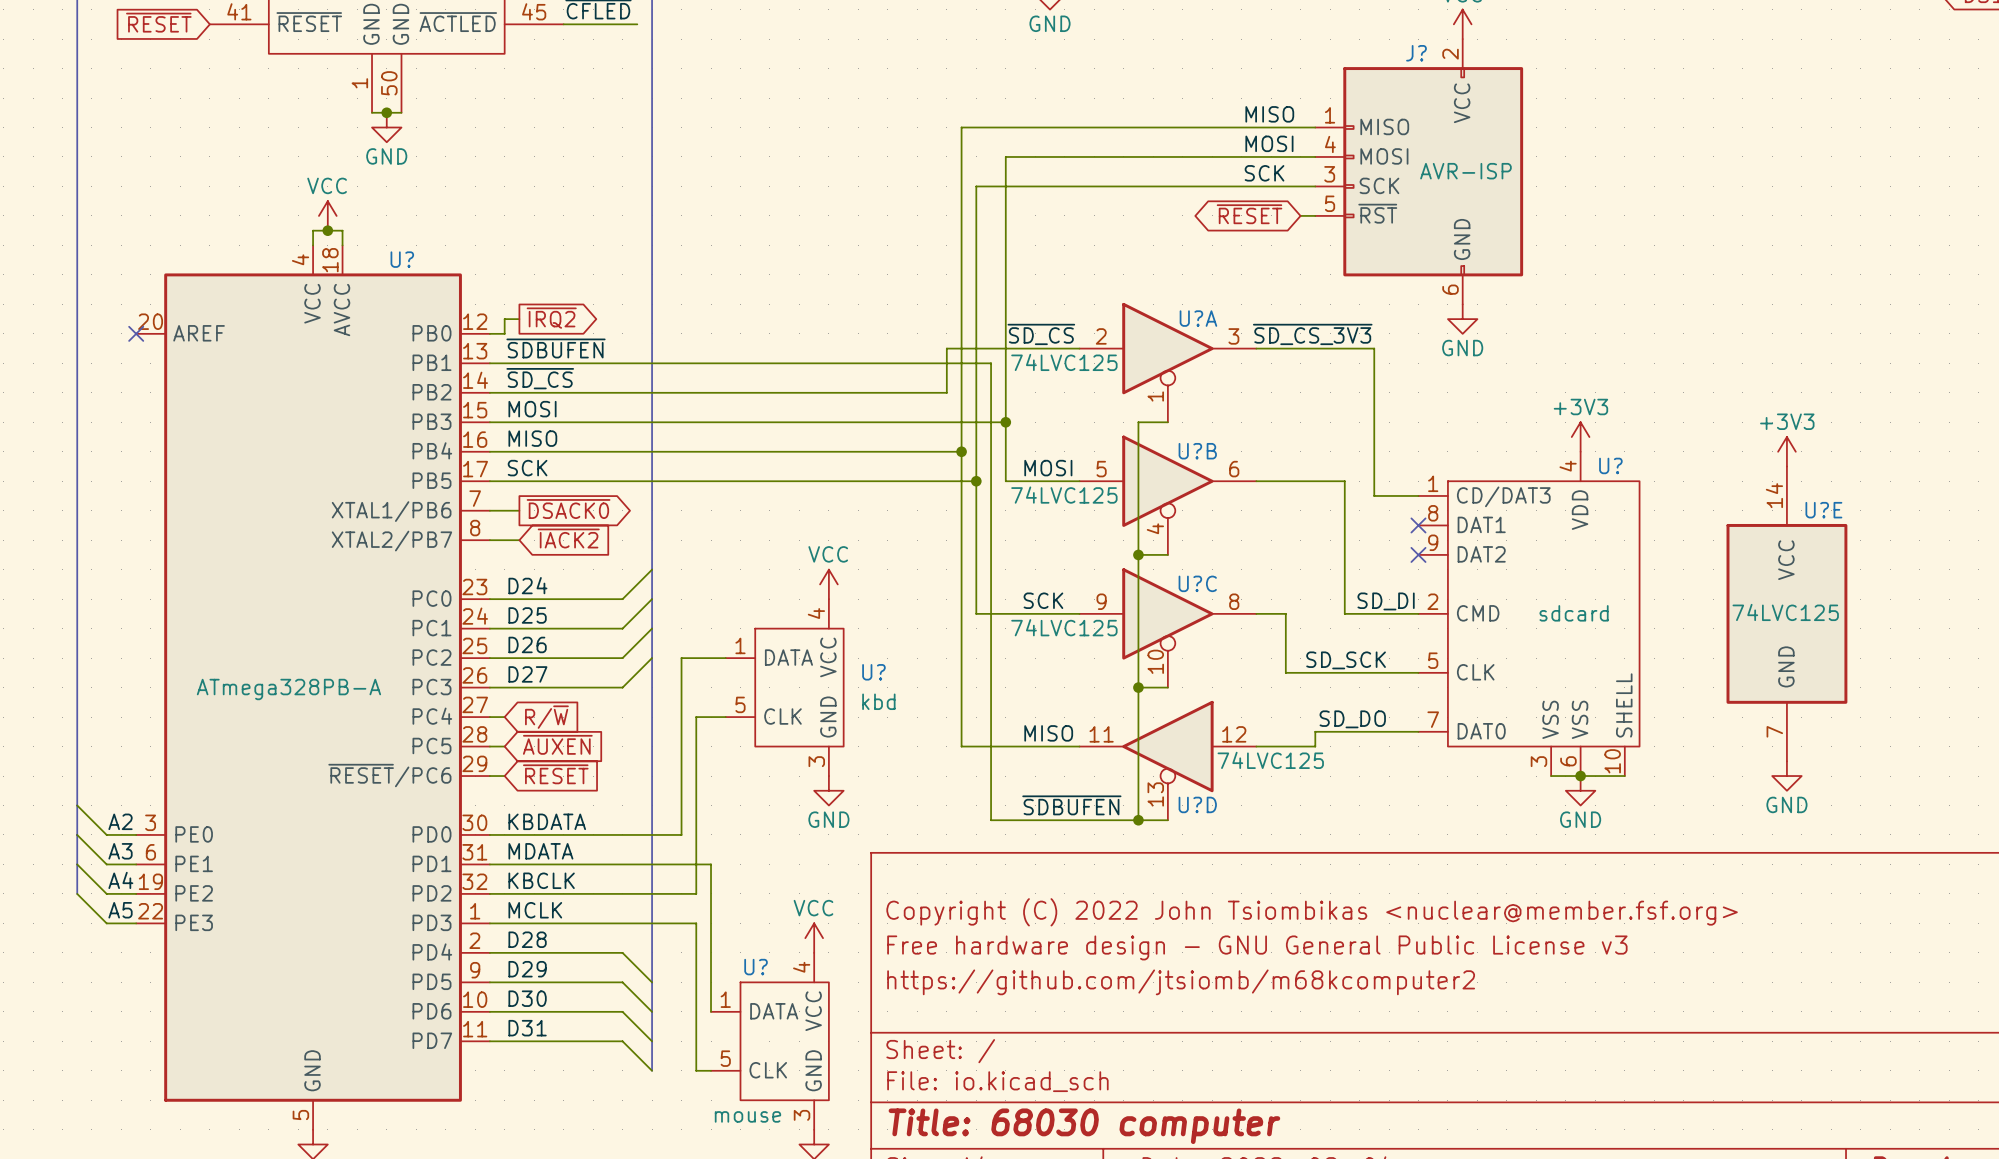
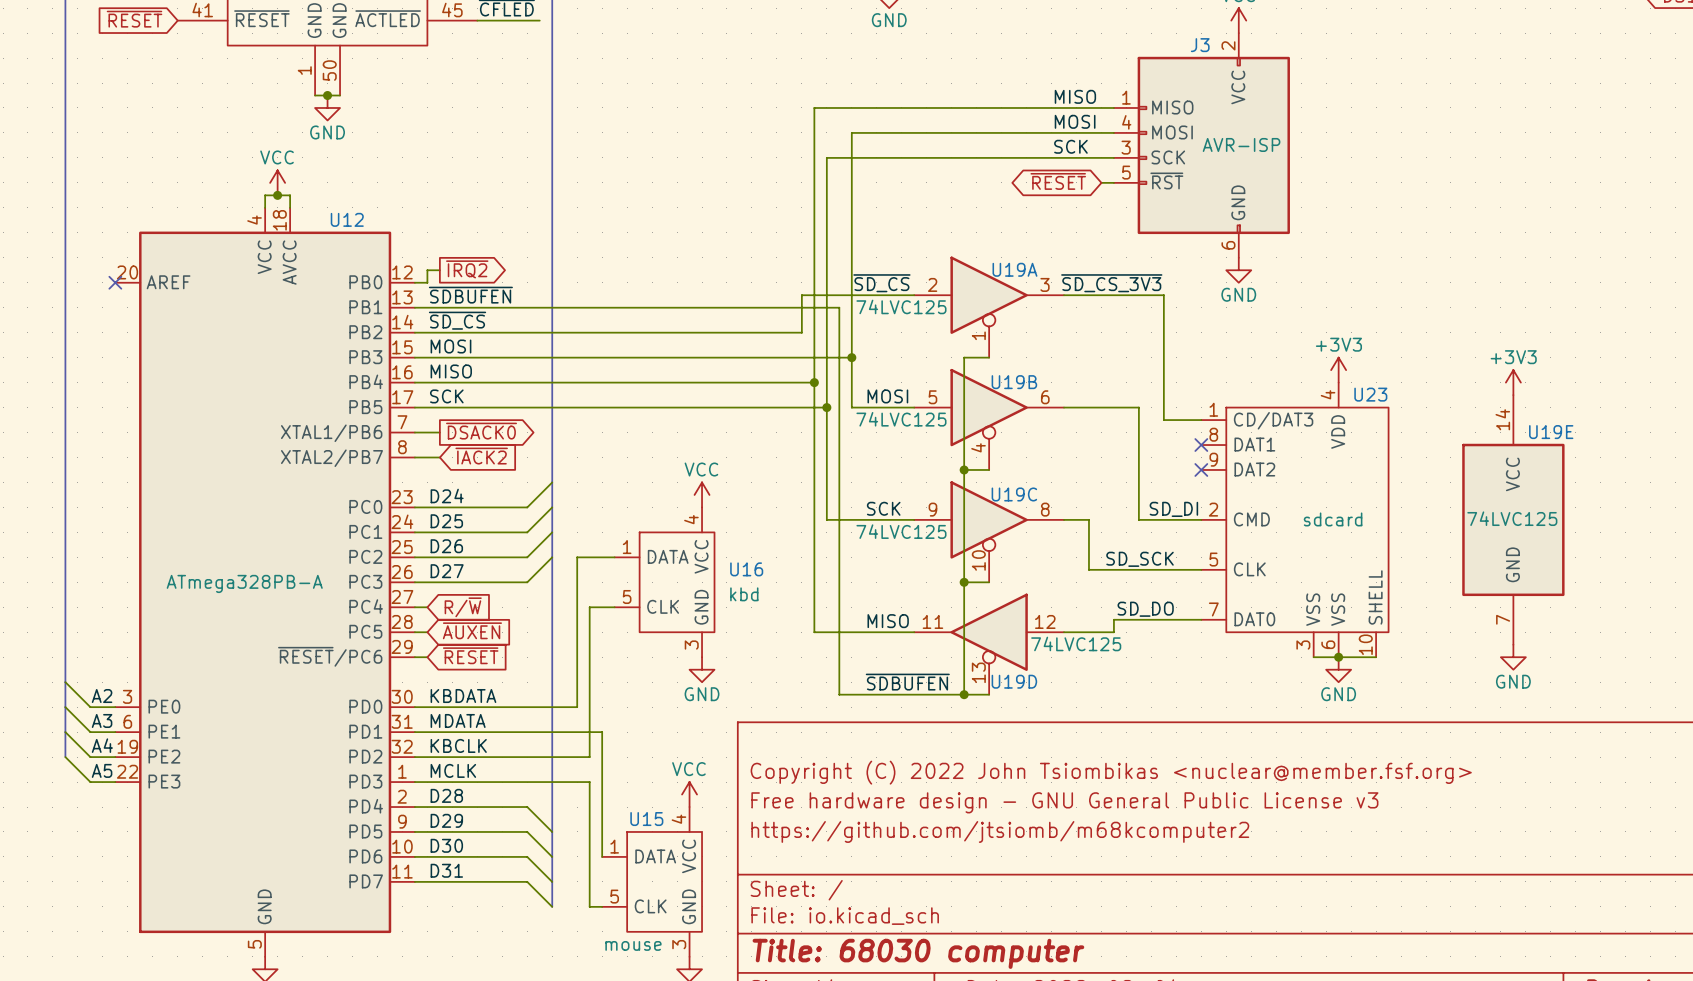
J? name: J? (1416, 53) -> J3 (1200, 45)
U? name: U? (402, 259) -> U12 (347, 219)
U?A name: U?A (1198, 318) -> U19A (1014, 269)
U?B name: U?B (1197, 451) -> U19B (1014, 382)
U? name: U? (1610, 465) -> U23 (1370, 394)
U?E name: U?E (1823, 510) -> U19E (1551, 432)
U?C name: U?C (1197, 583) -> U19C (1014, 494)
U? name: U? (873, 672) -> U16 (746, 569)
U?D name: U?D (1197, 804) -> U19D (1014, 681)
U? name: U? (756, 967) -> U15 (646, 819)

